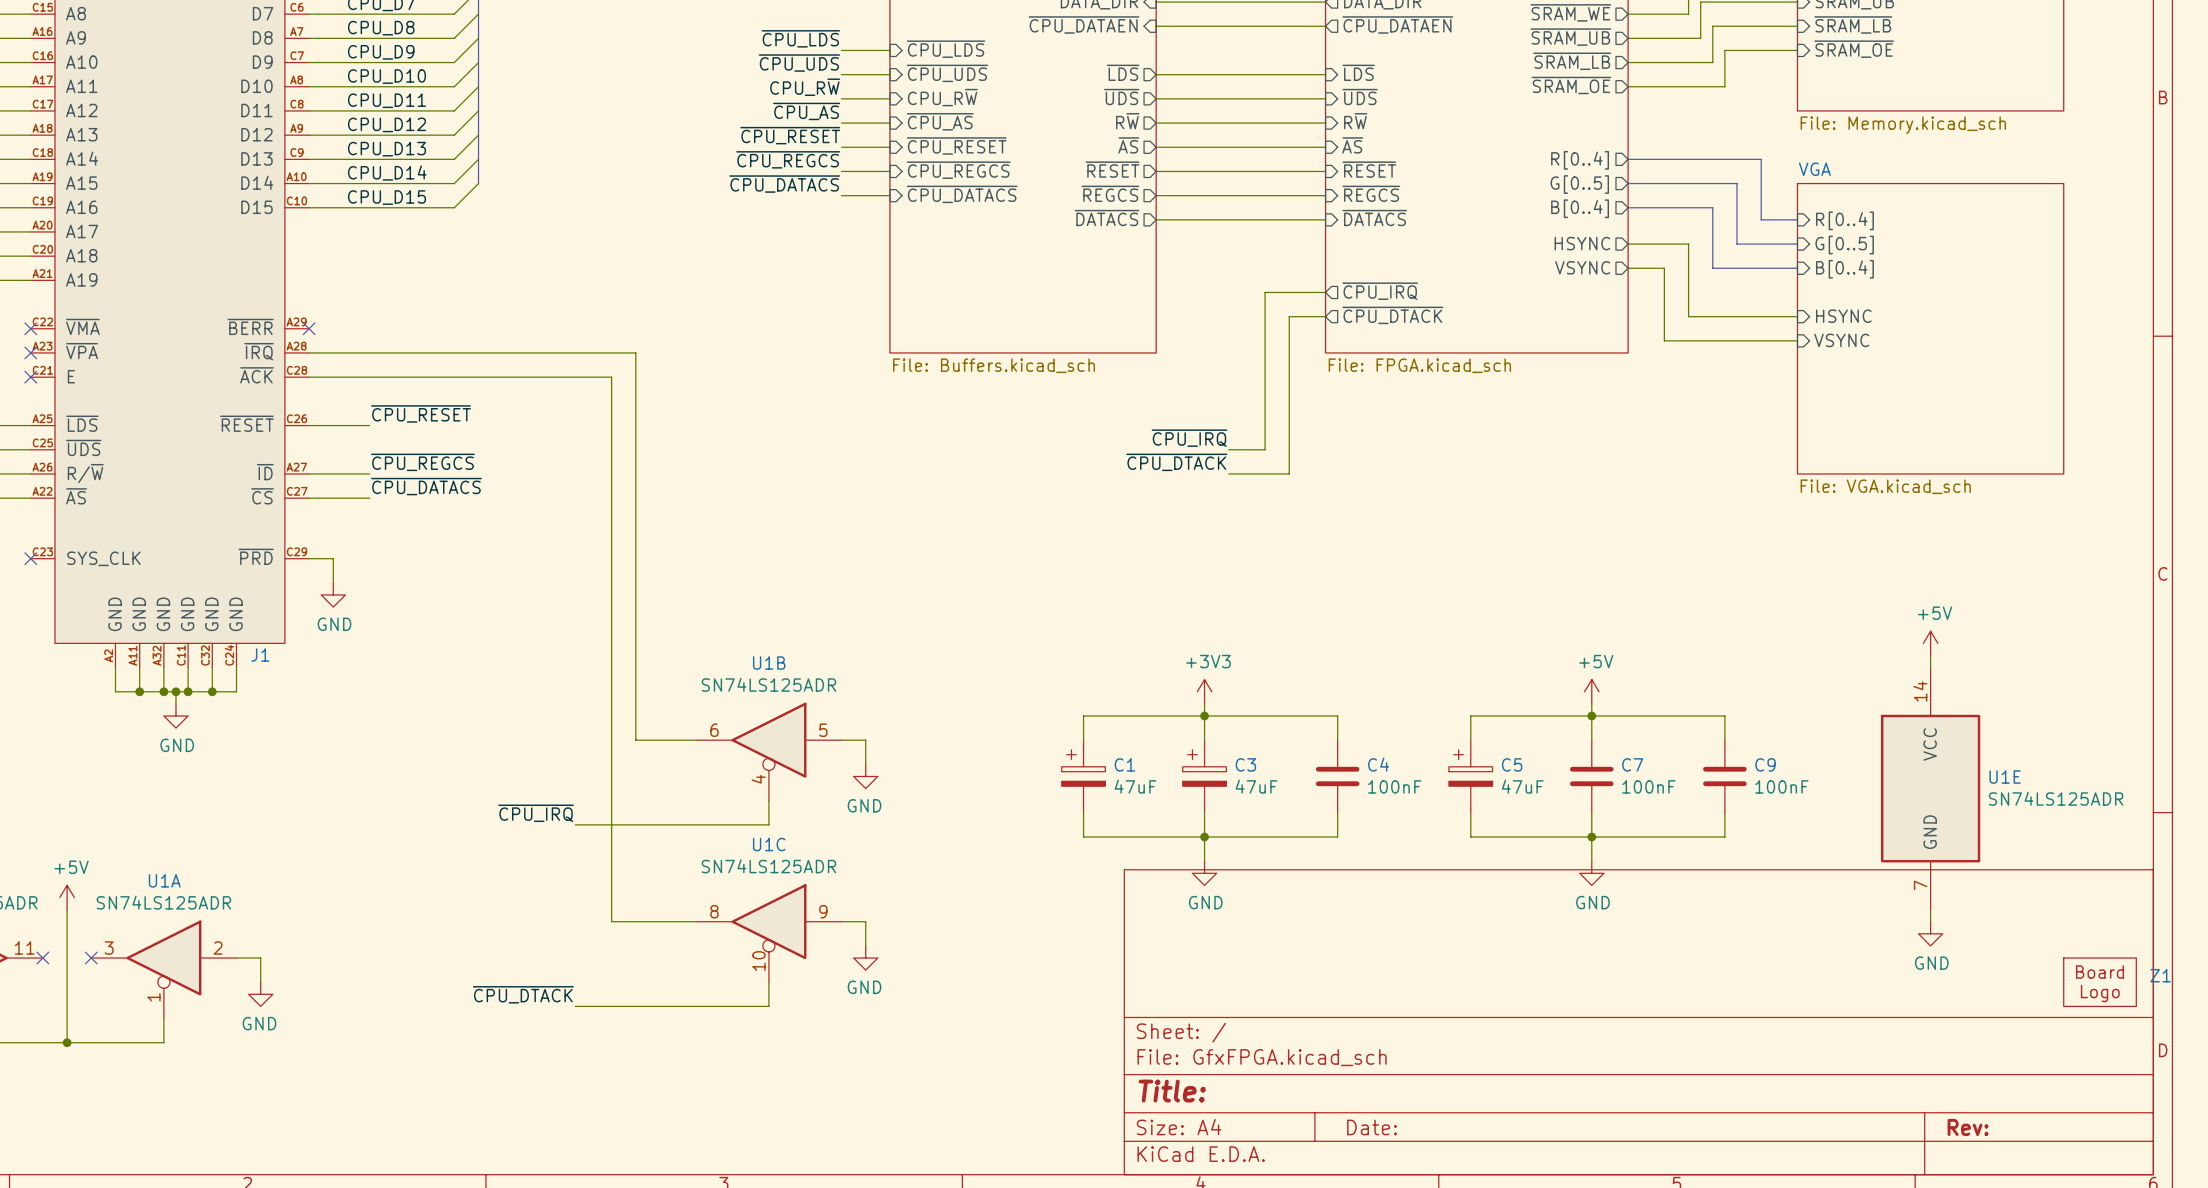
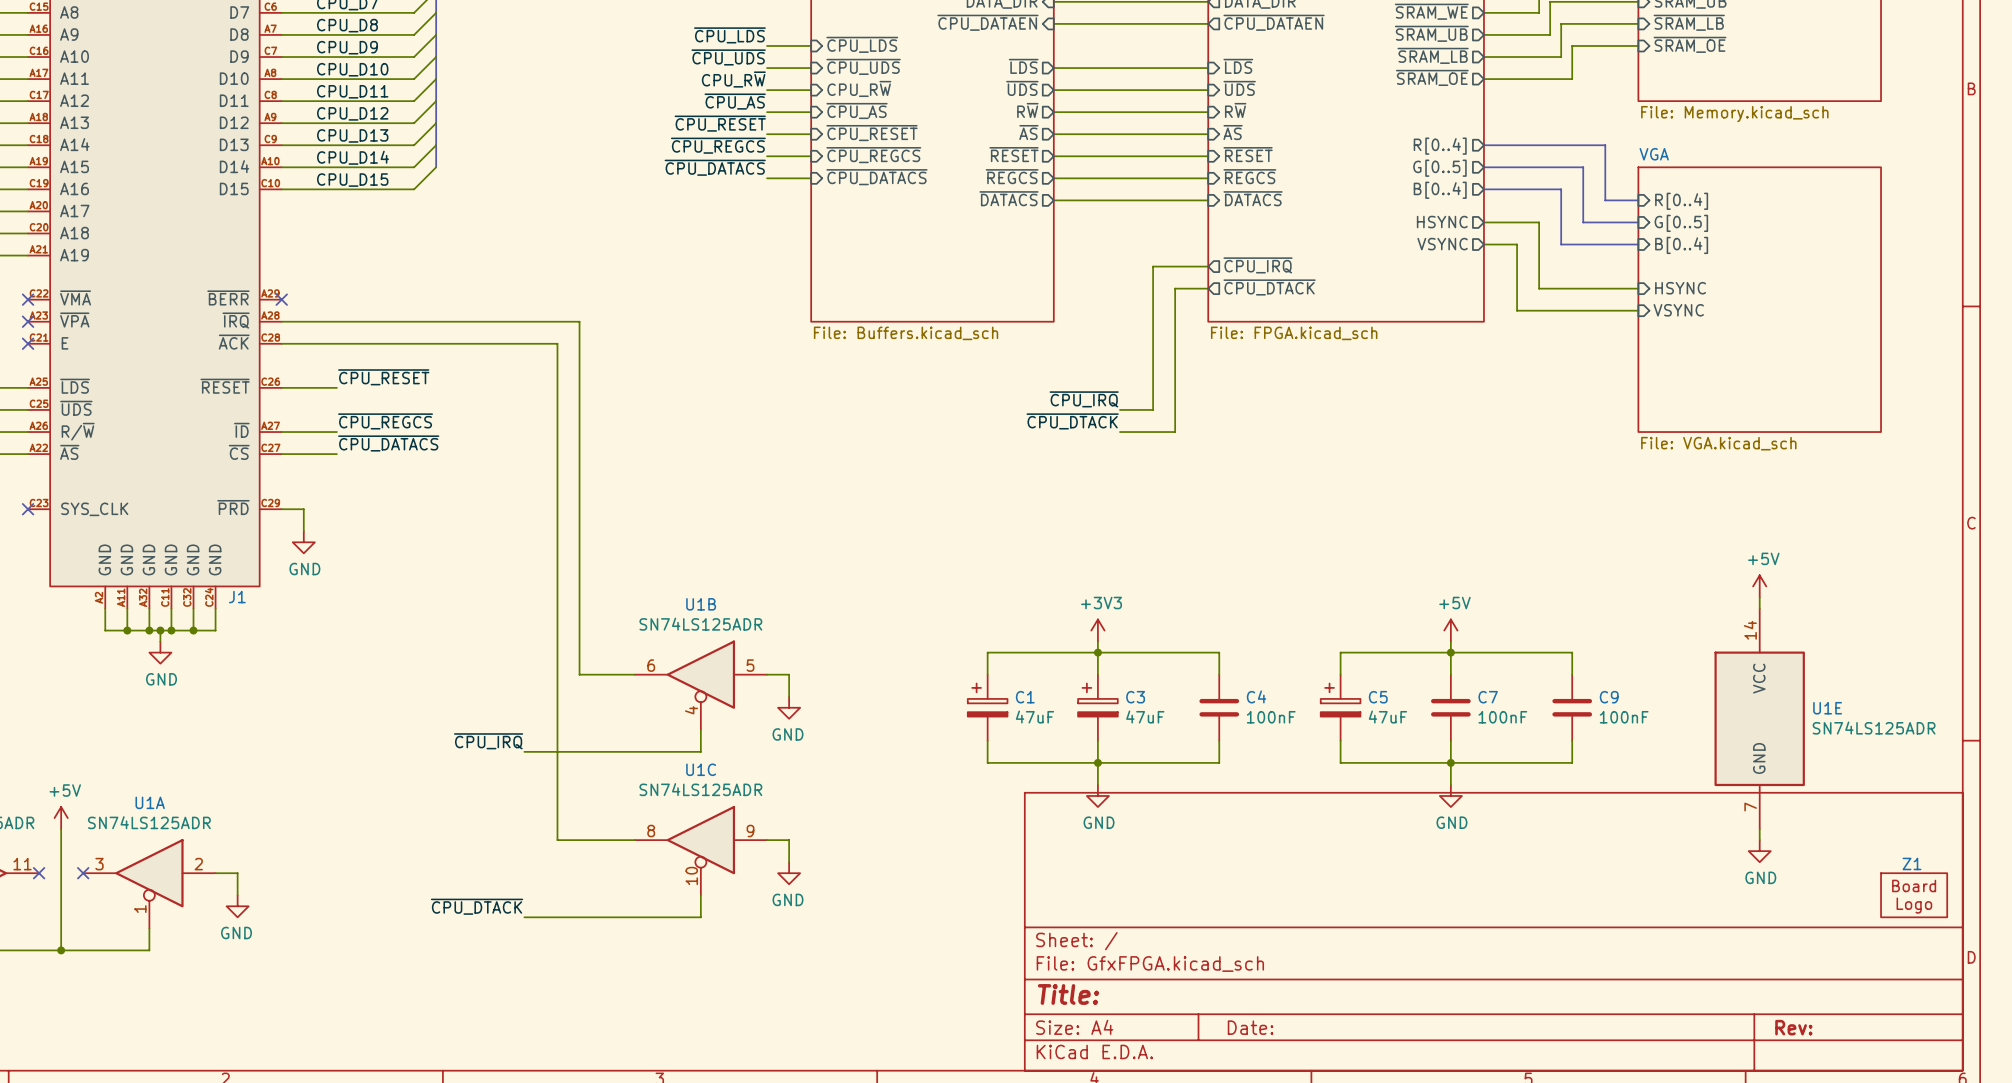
Z1 name position: Z1 (2160, 975) -> Z1 (1912, 863)

